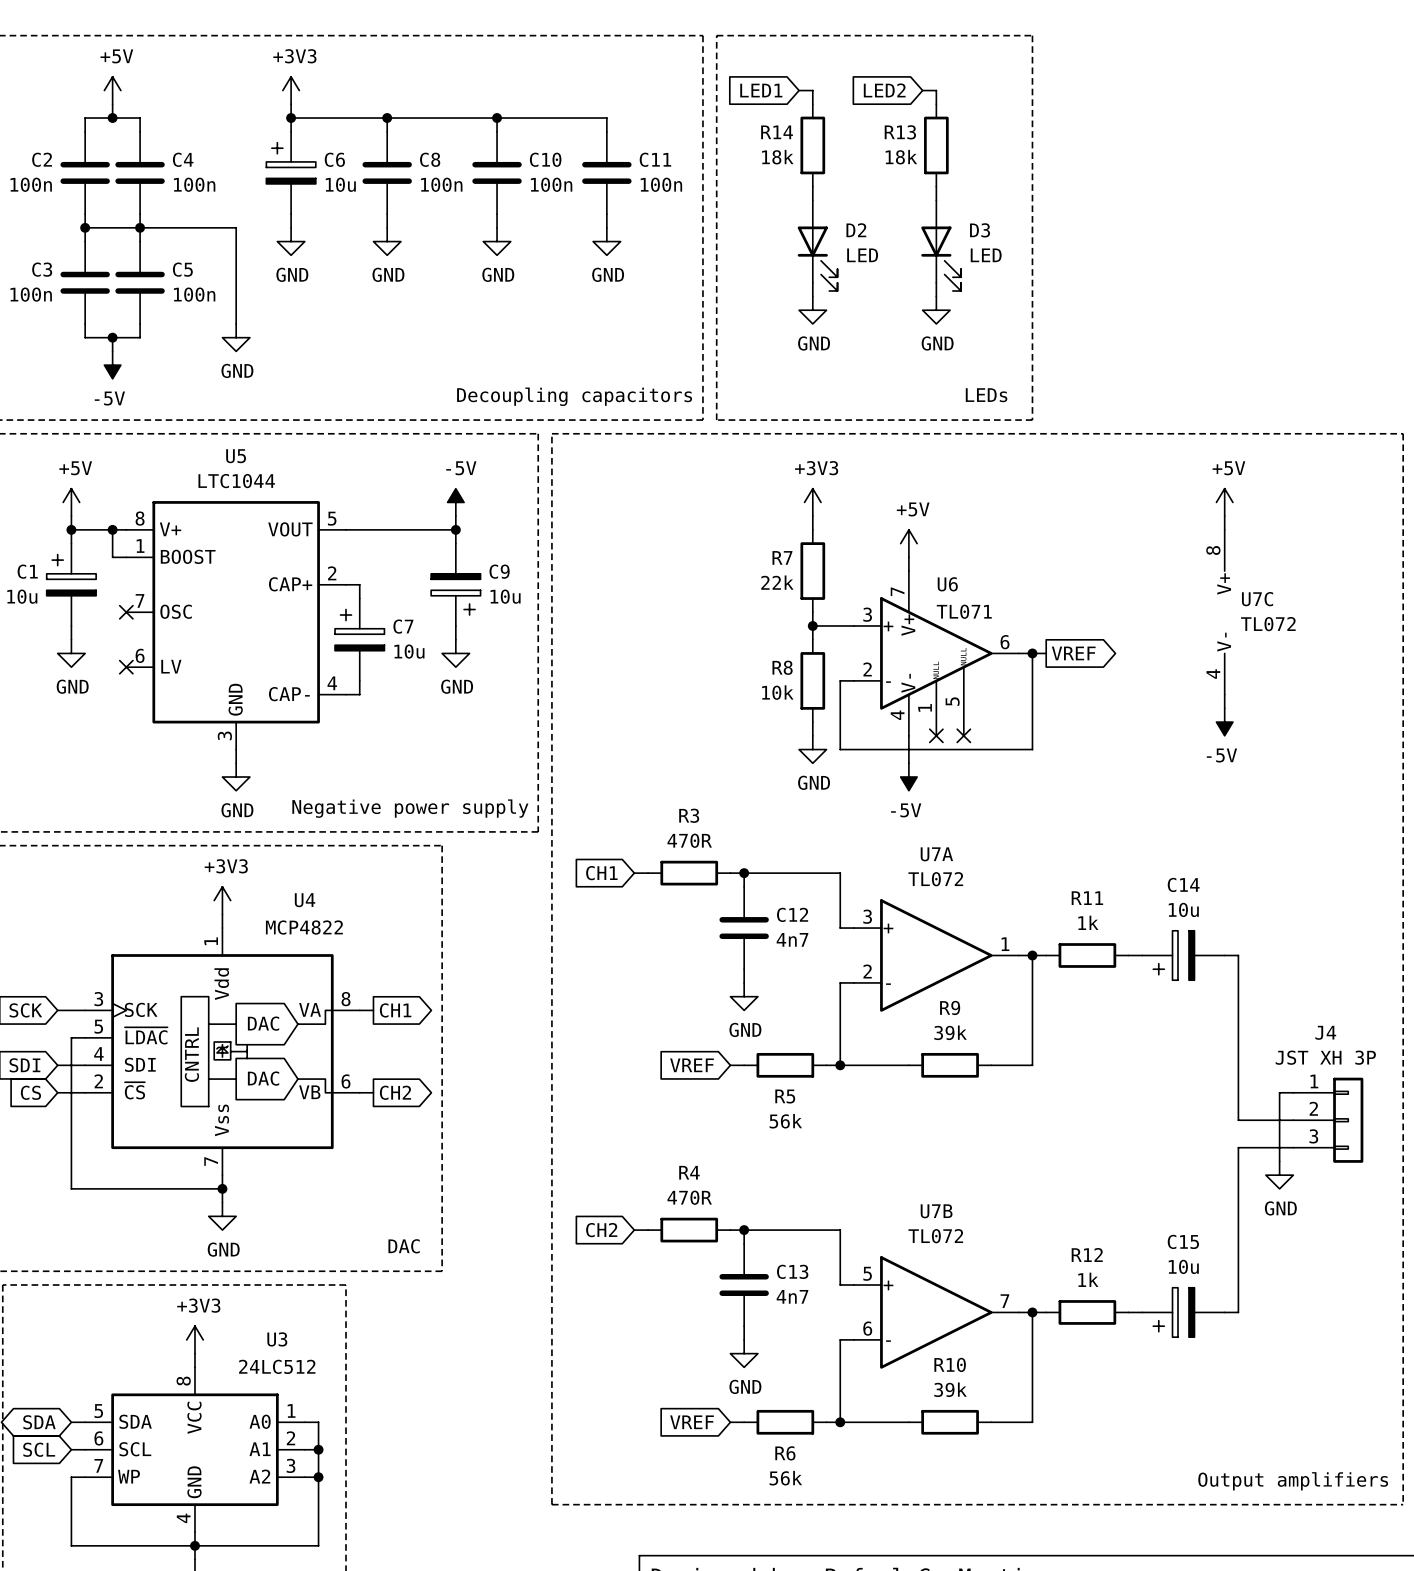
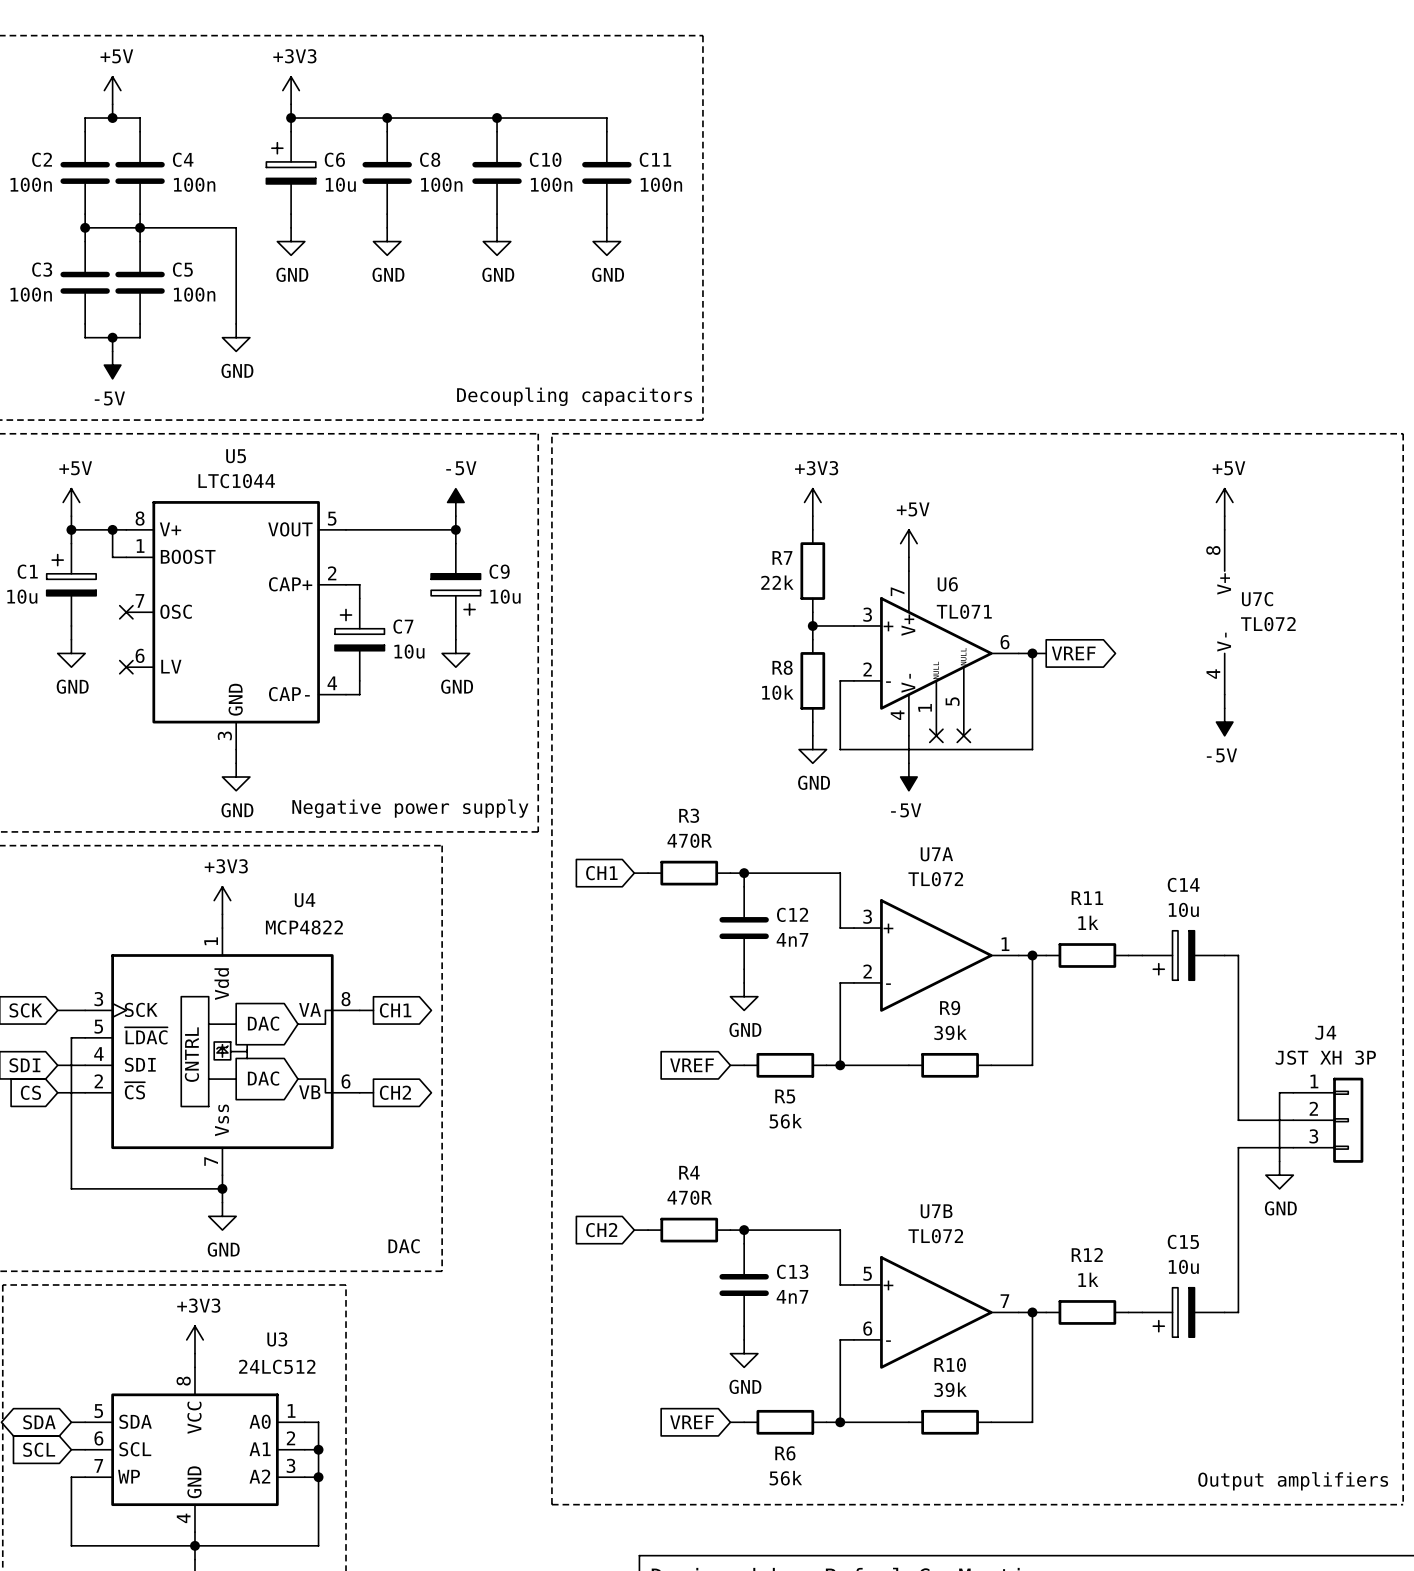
line: (716, 35) (716, 420) (1032, 420) (1032, 35) (716, 35) -> none
global label: LED1 (761, 90) -> none
wire: (799, 90) (812, 90) (812, 104) -> none
global label: LED2 (884, 90) -> none
wire: (922, 90) (936, 90) (936, 104) -> none
R14: 18k (812, 145) -> none
R13: 18k (936, 145) -> none
wire: (812, 186) (812, 200) -> none
wire: (936, 186) (936, 200) -> none
D2: LED (817, 245) -> none
D3: LED (941, 245) -> none
wire: (812, 282) (812, 296) -> none
wire: (936, 282) (936, 296) -> none
power symbol: GND (812, 310) -> none
power symbol: GND (936, 310) -> none
text: LEDs (986, 395) -> none

